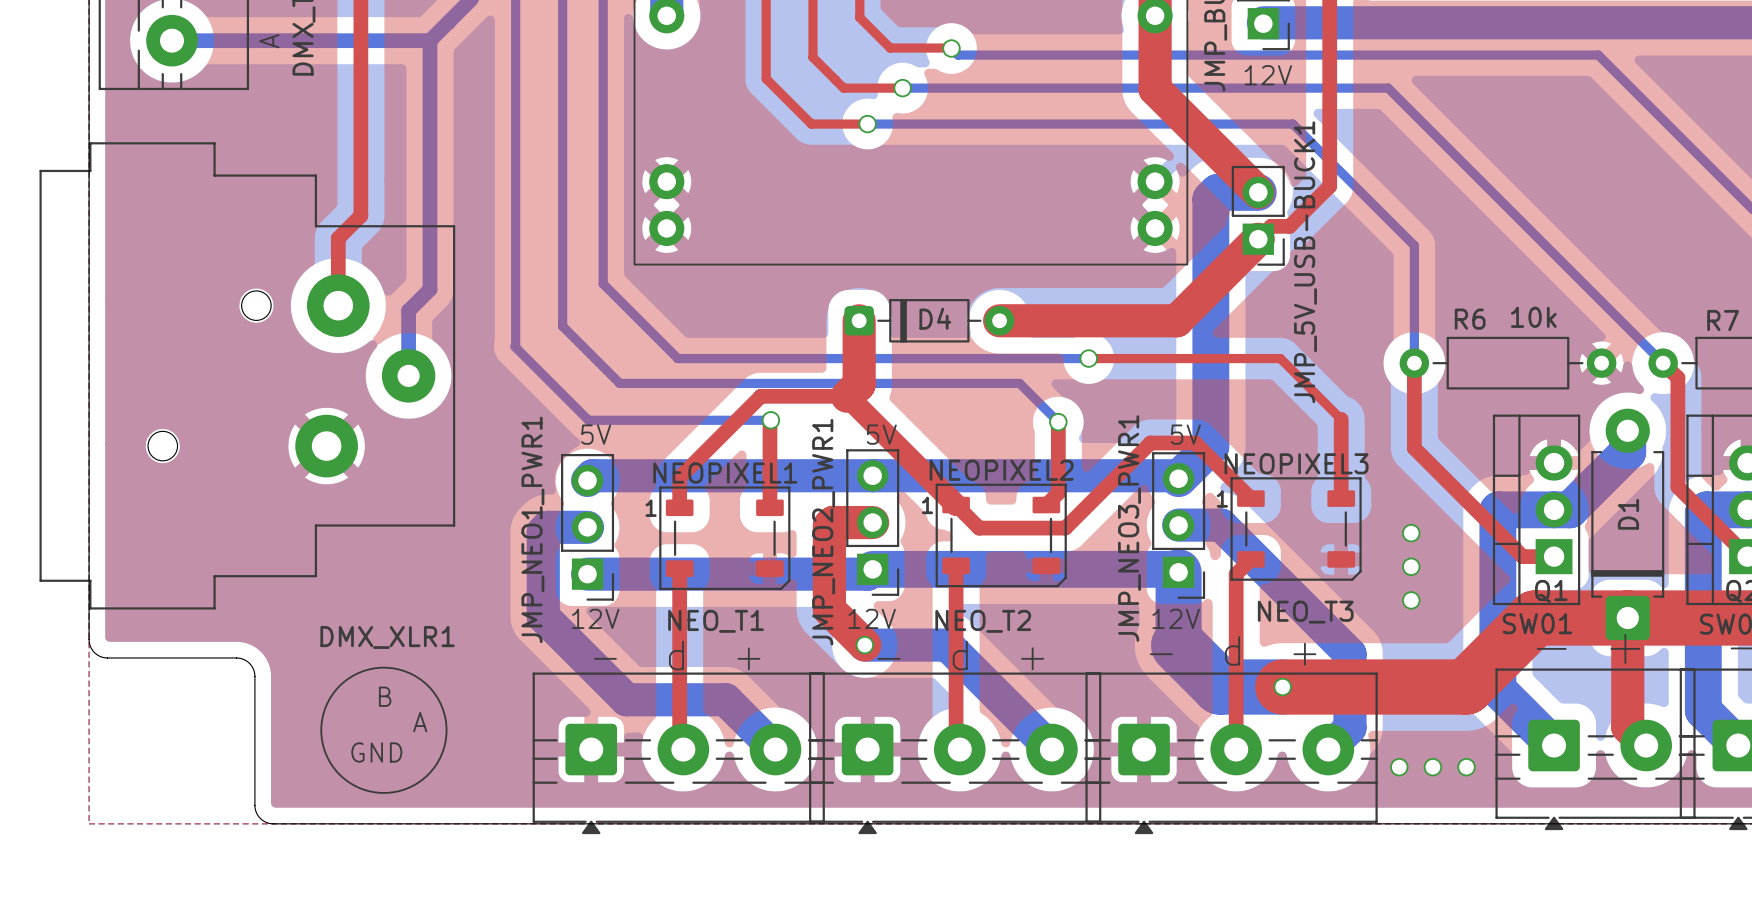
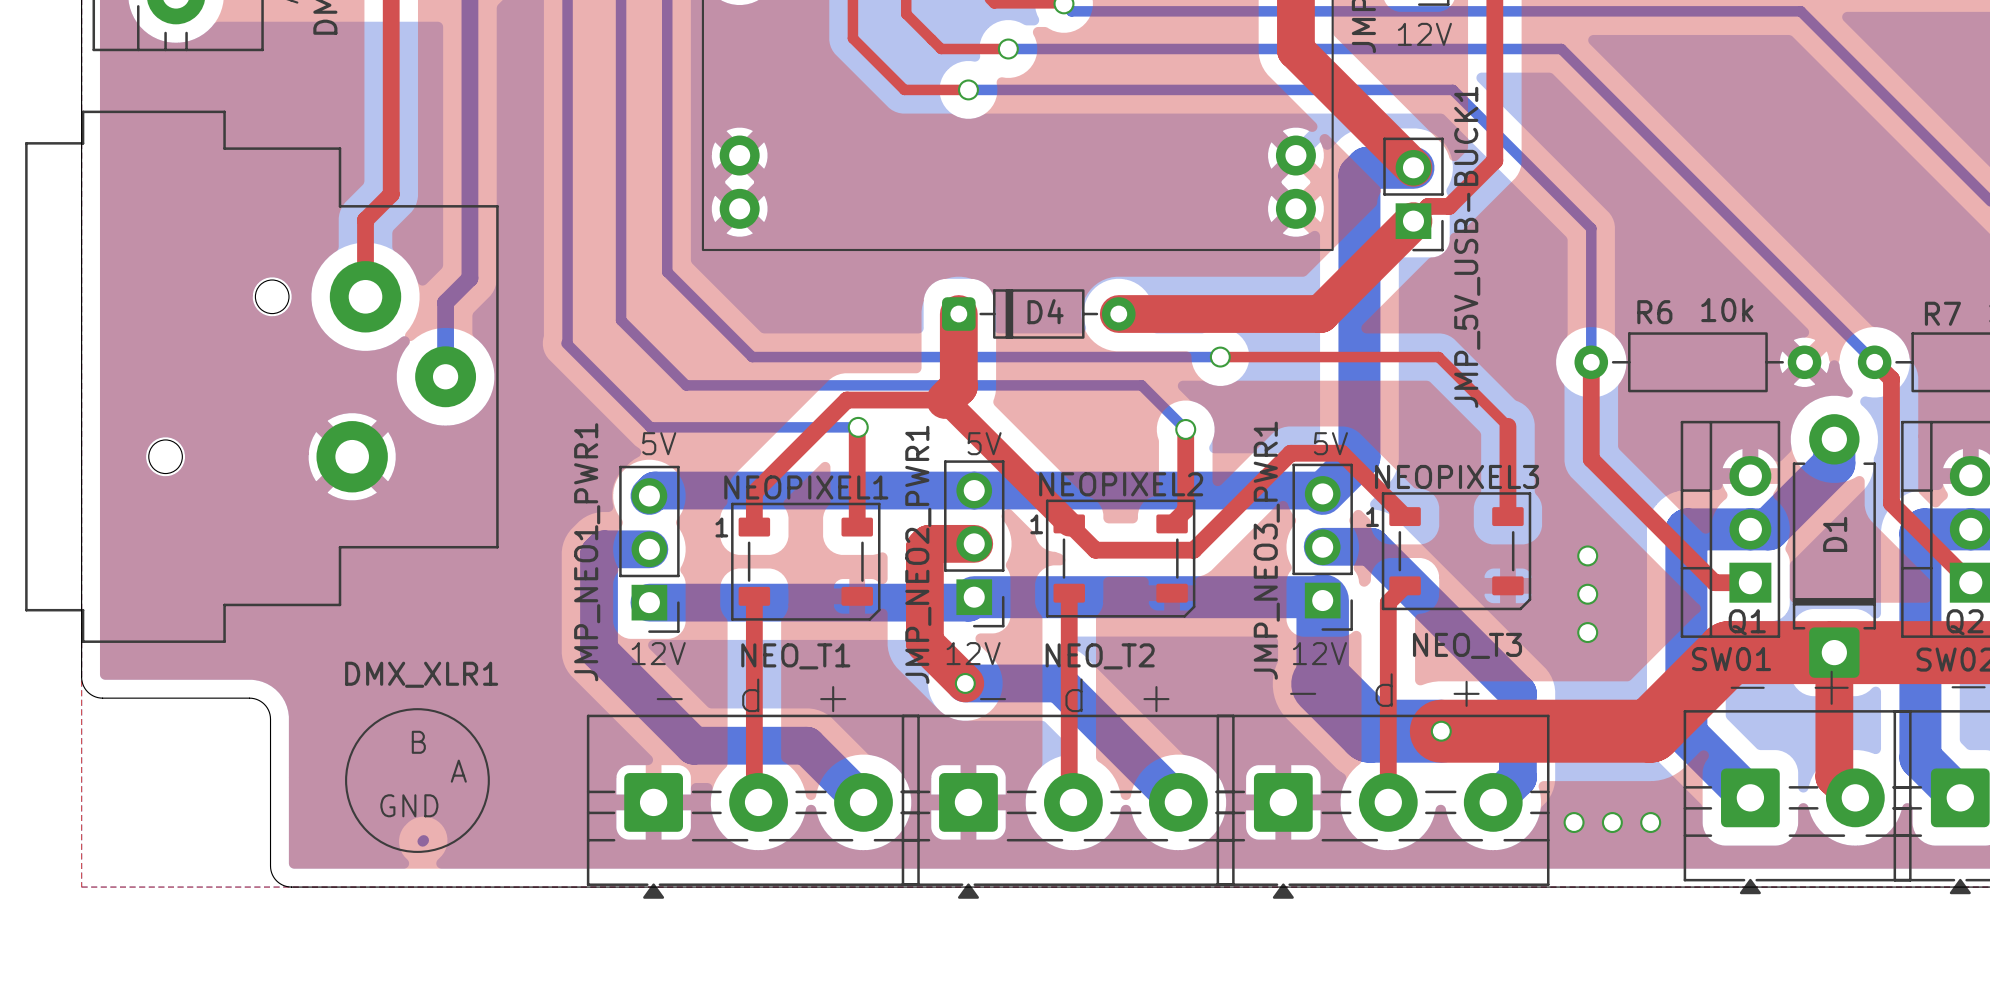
bottom track: none -> (423, 840) (422, 841)

